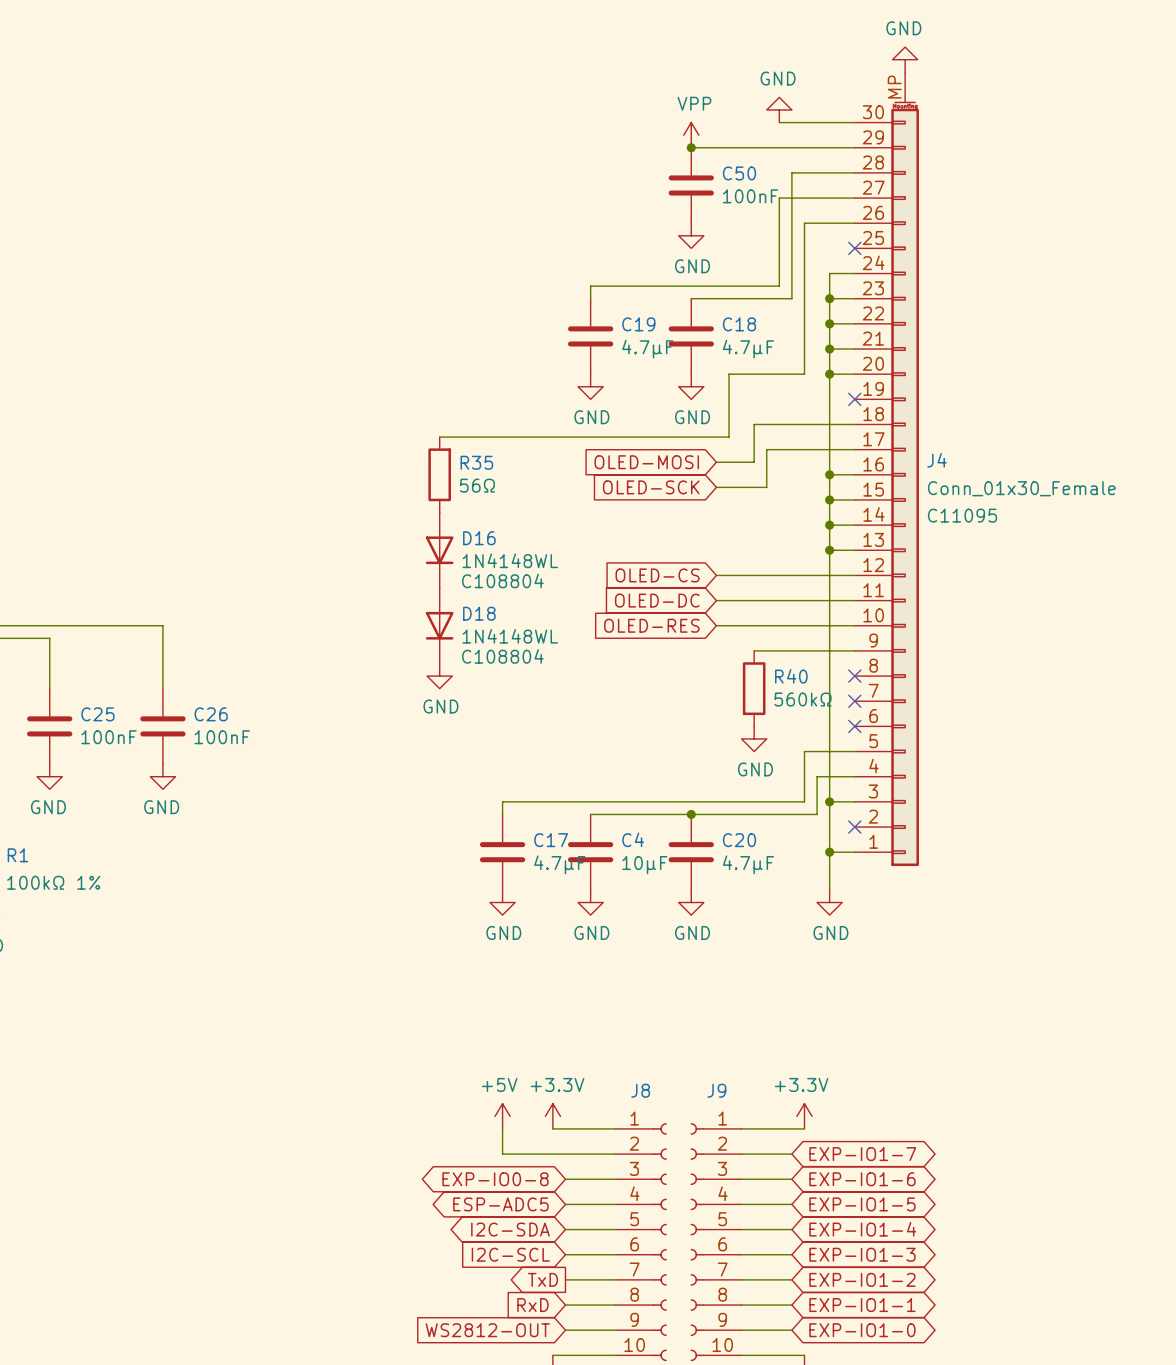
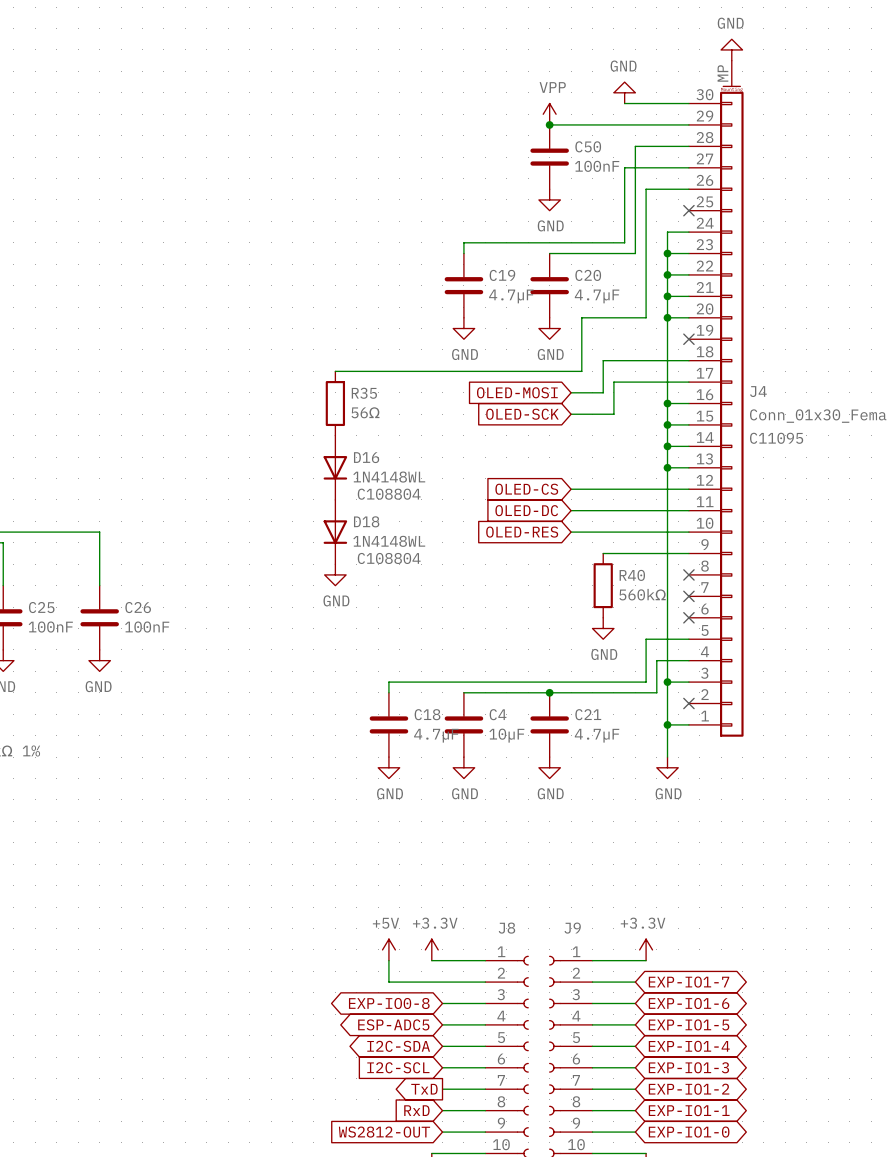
C18 name: C18 (739, 324) -> C20 (588, 275)
C17 name: C17 (551, 840) -> C18 (427, 714)
C20 name: C20 (739, 840) -> C21 (588, 714)

